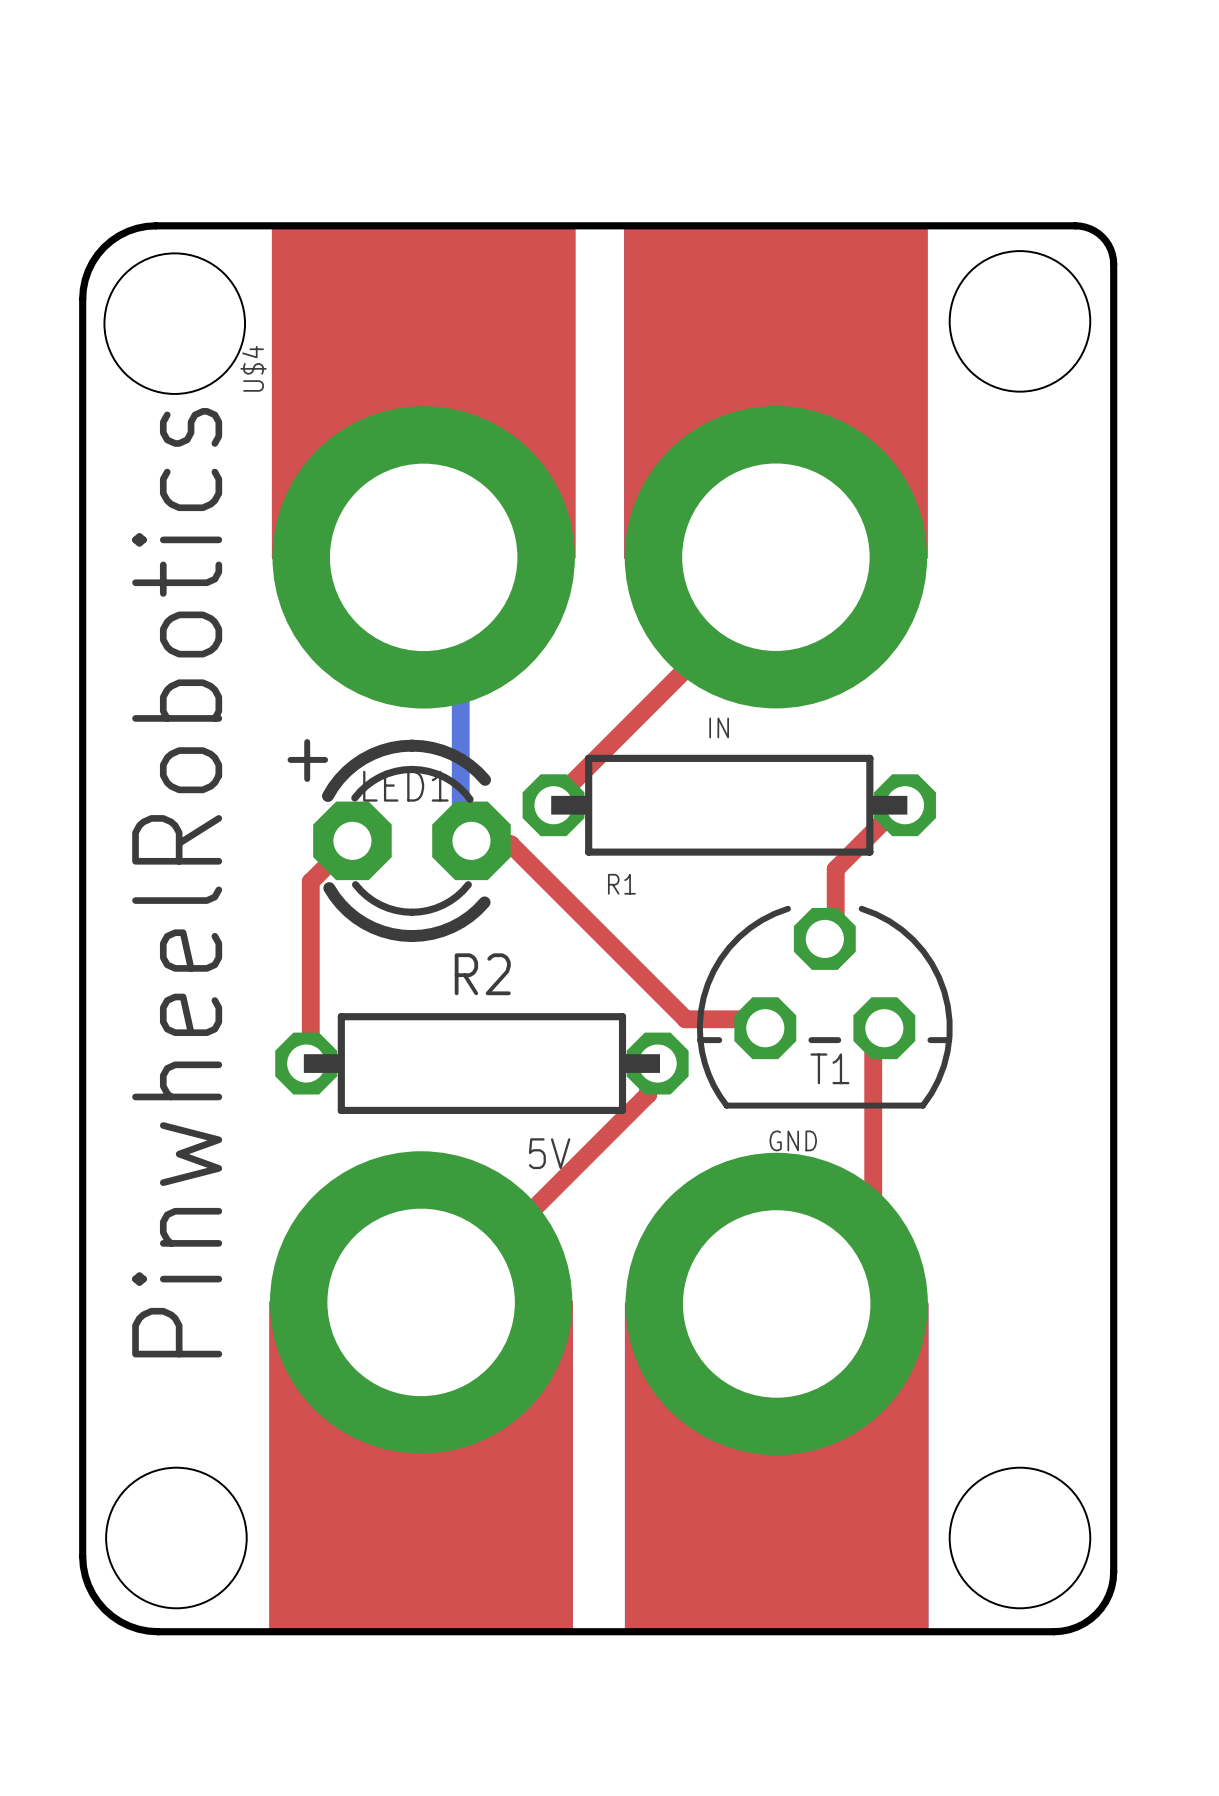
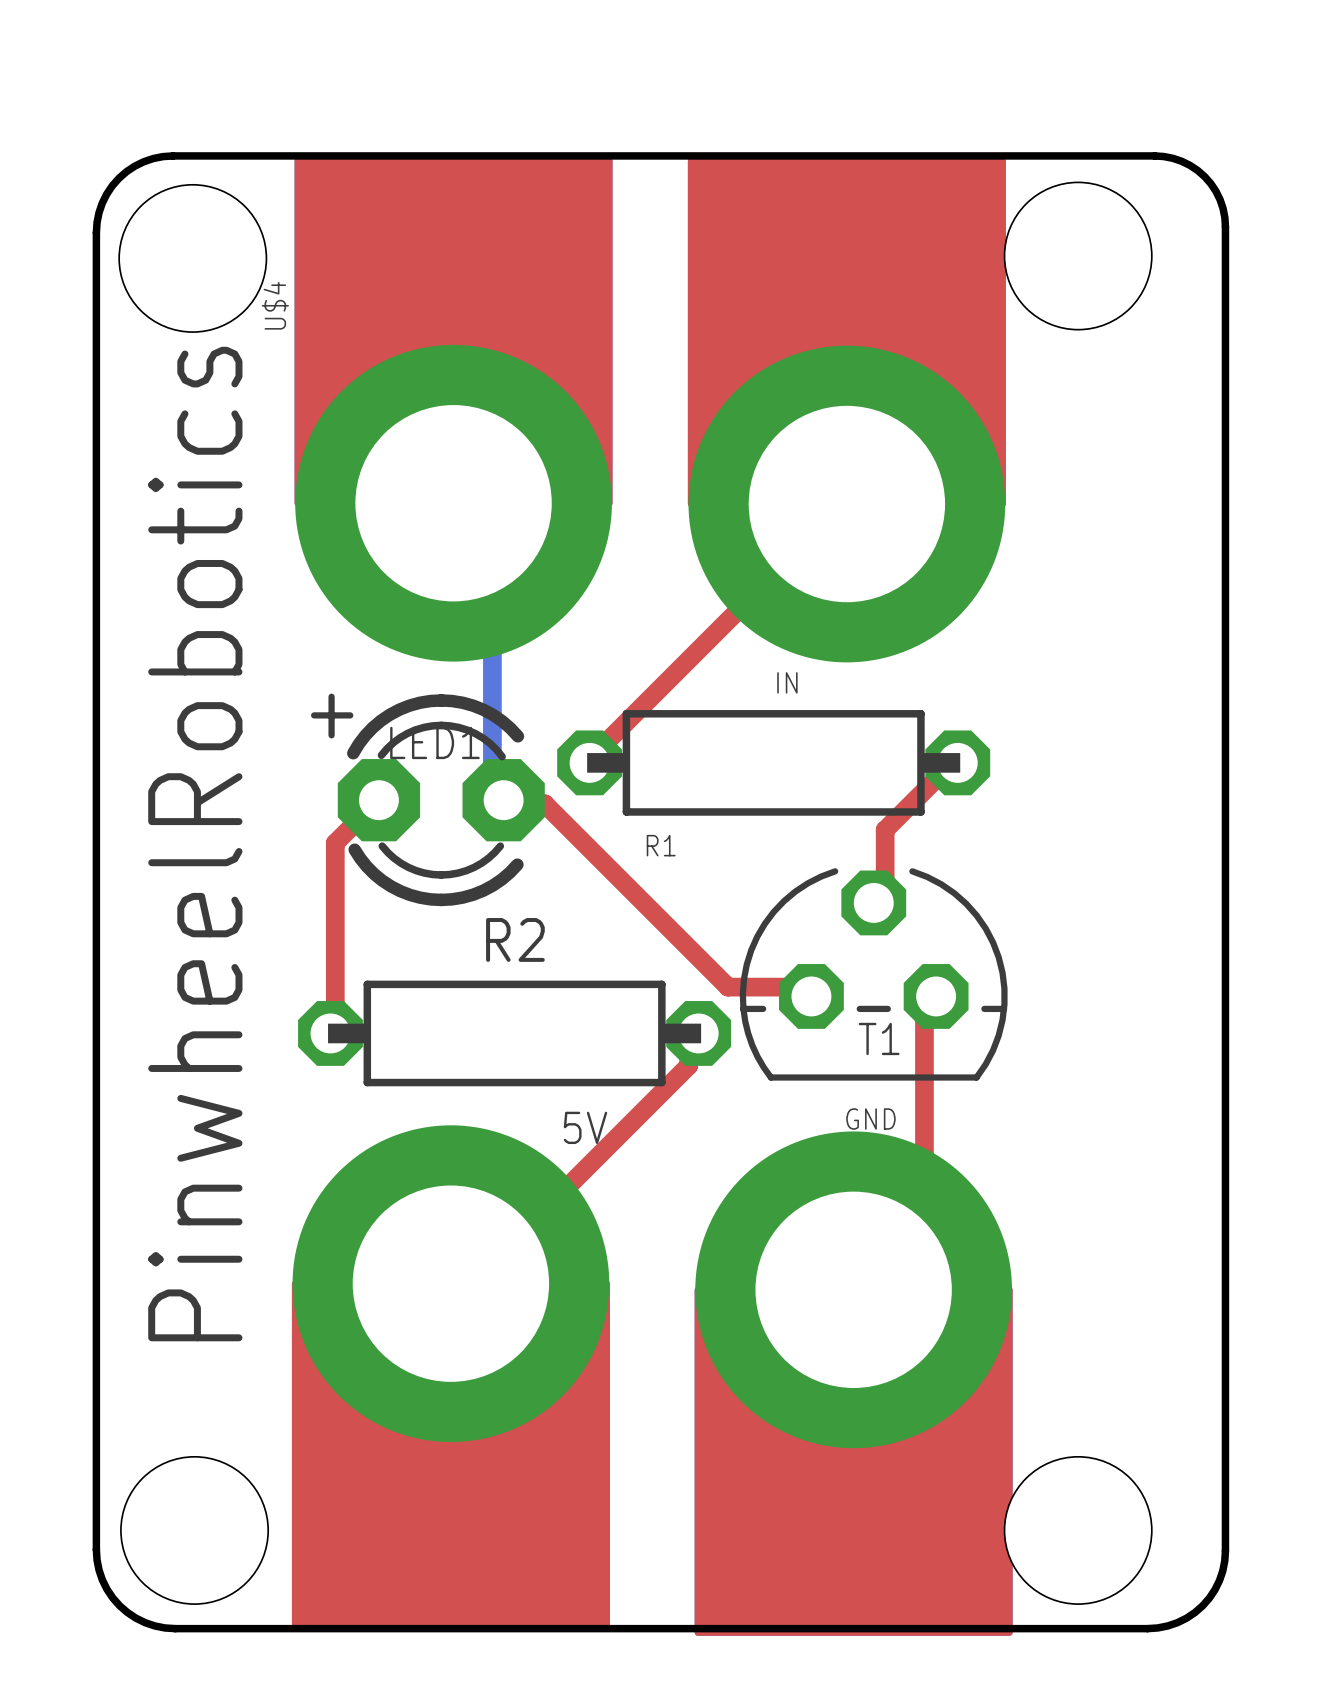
board edge: (1075, 225) (1090, 228) (1102, 237) (1110, 249) (1113, 264) (1113, 1572) (1109, 1594) (1096, 1614) (1076, 1627) (1054, 1631) -> (1136, 155) (1172, 158) (1197, 170) (1215, 191) (1223, 208) (1225, 226) (1225, 1550) (1222, 1570) (1215, 1589) (1194, 1612) (1177, 1622) (1157, 1627) (1113, 1628)
IN position: (775, 467) -> (846, 410)
GND position: (776, 1393) -> (853, 1383)

